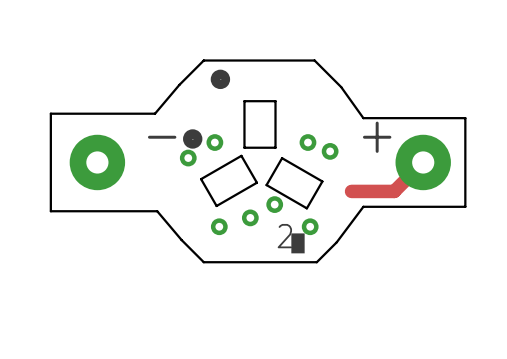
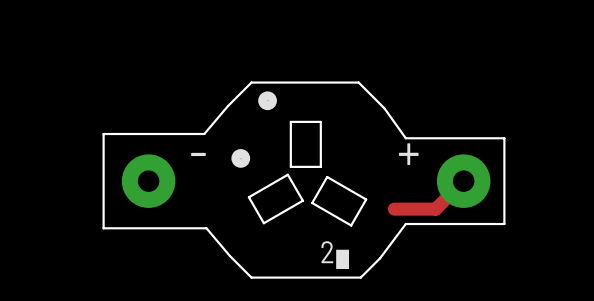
via: (214, 142) -> none
via: (307, 142) -> none
via: (330, 151) -> none
via: (188, 158) -> none
via: (274, 204) -> none
via: (250, 217) -> none
via: (219, 226) -> none
via: (310, 226) -> none

